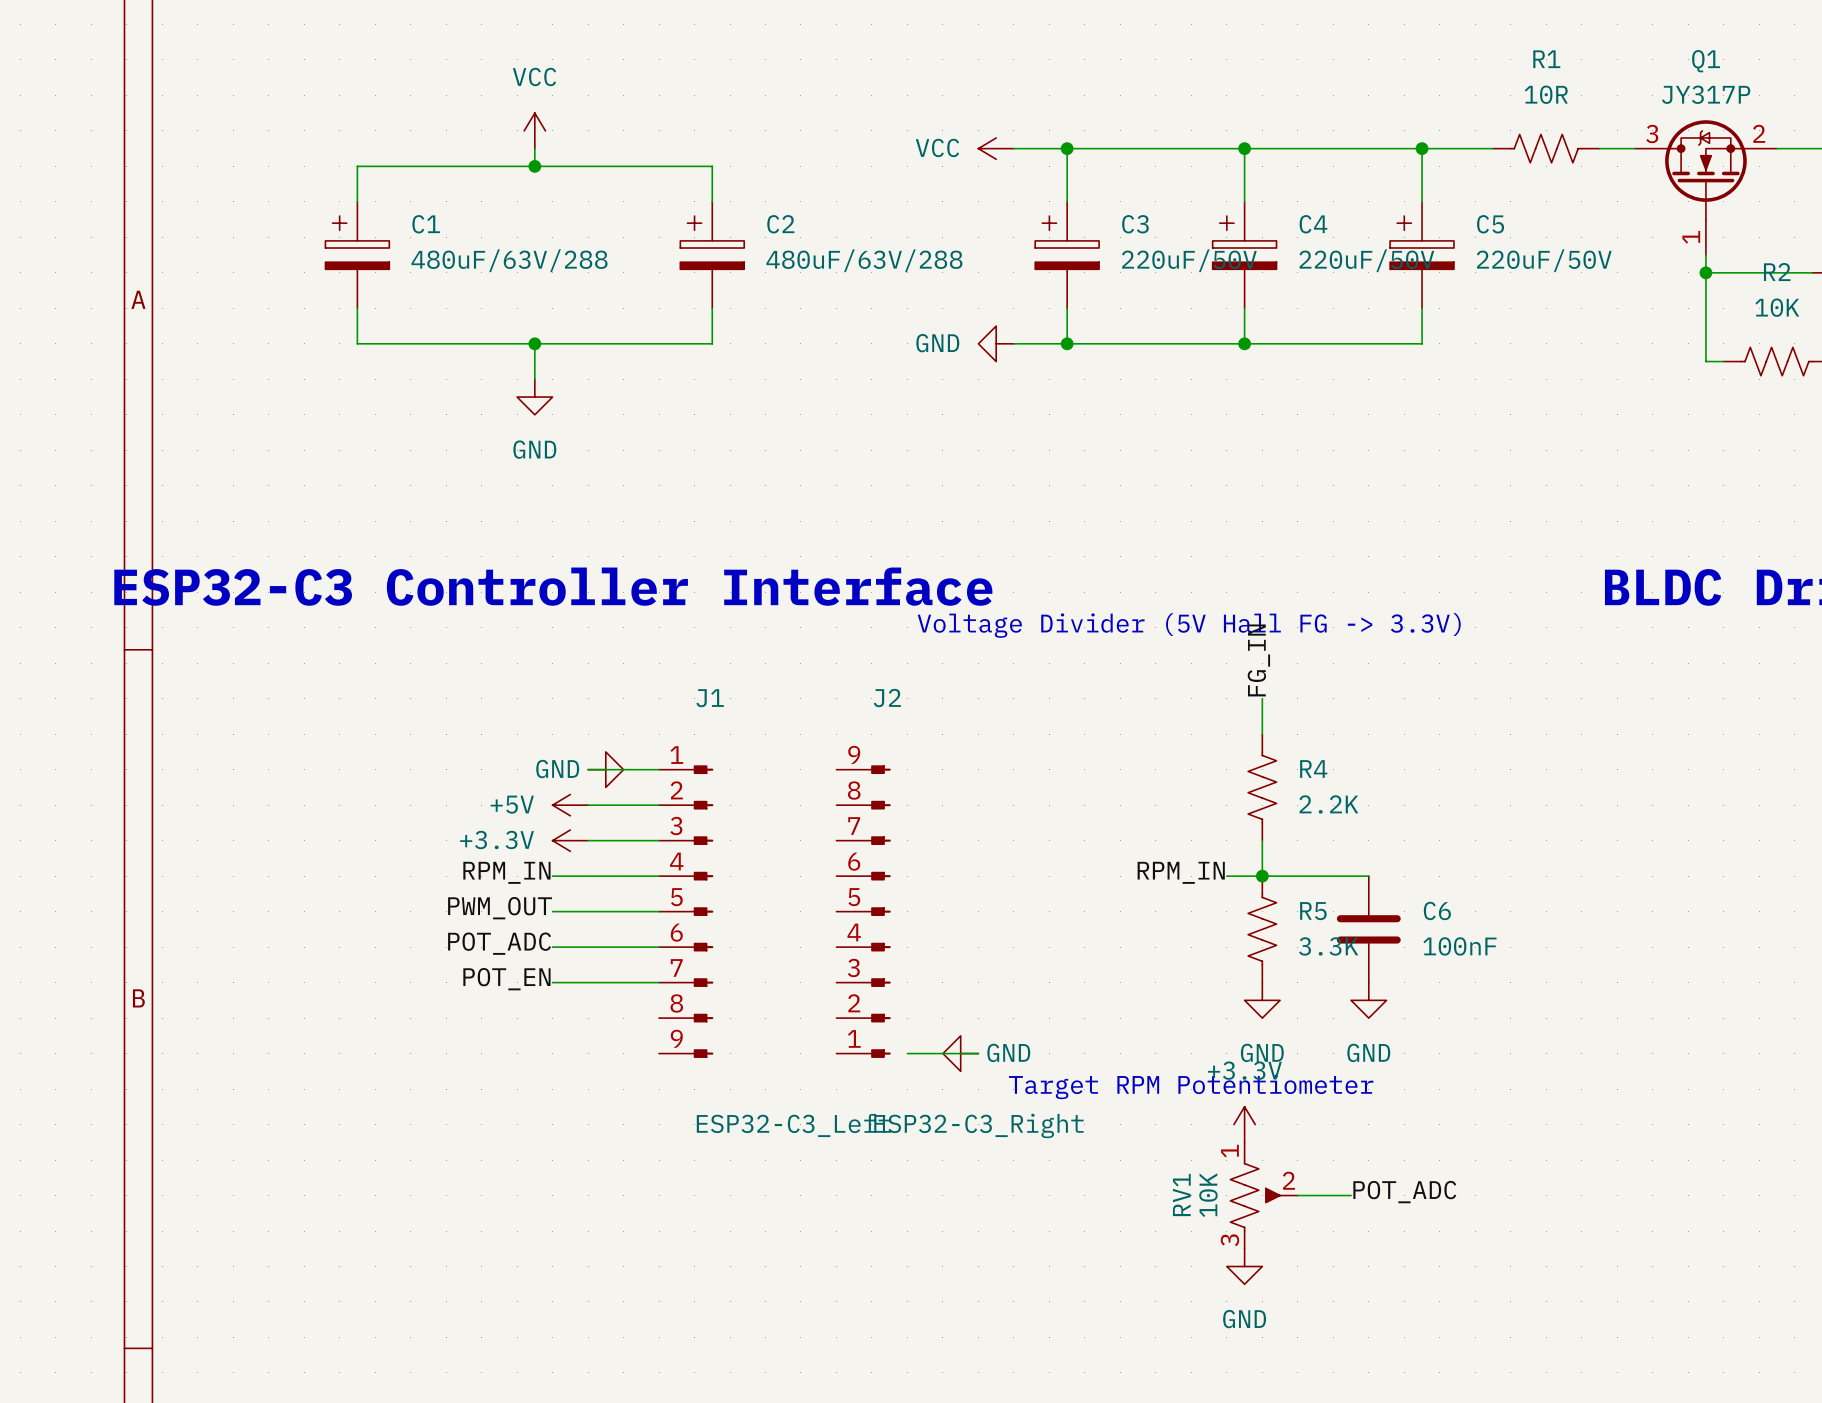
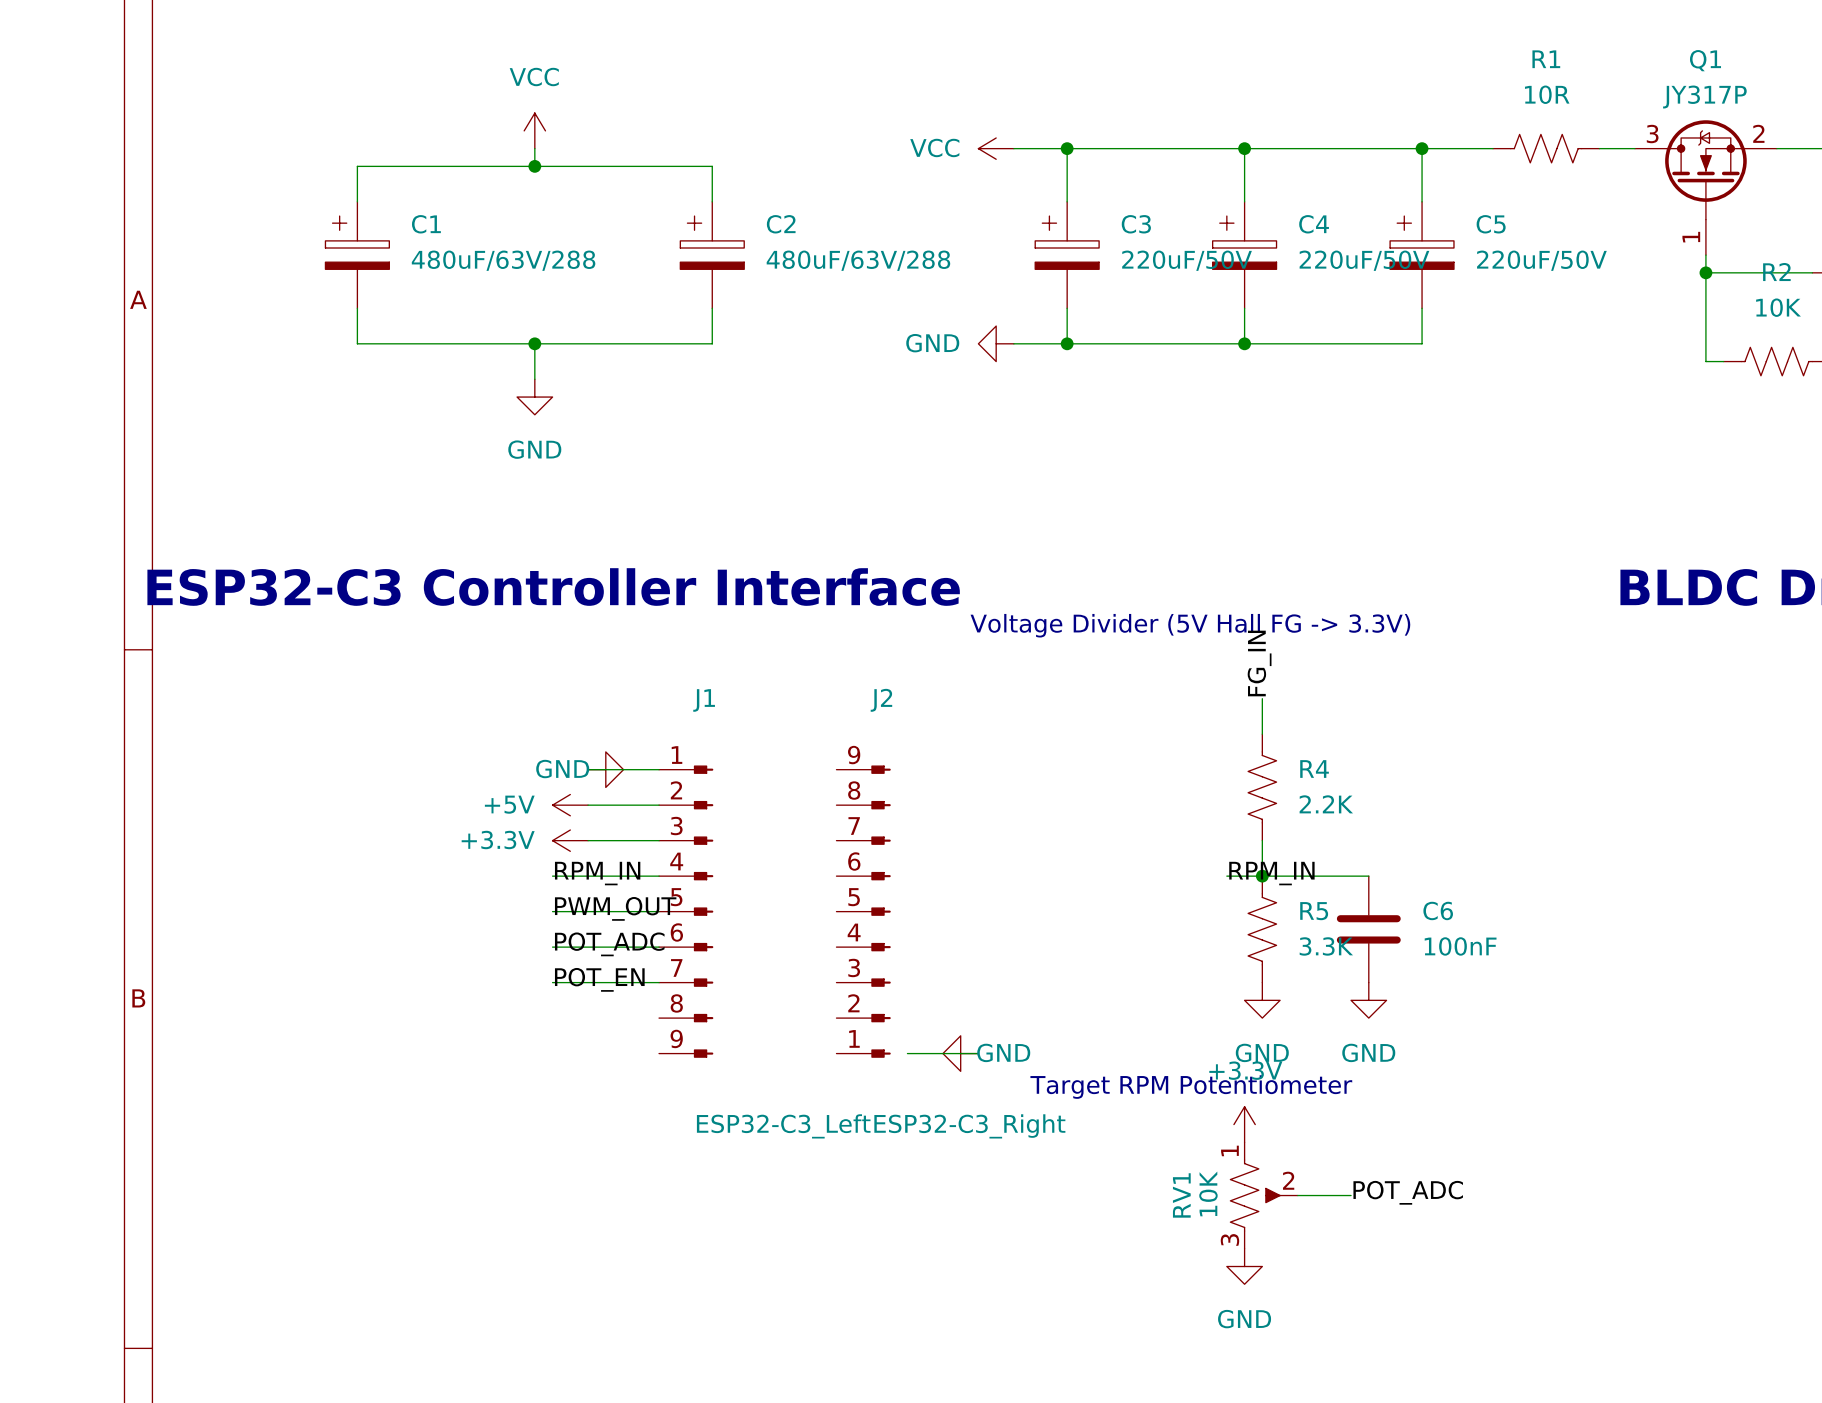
label position: RPM_IN (506, 872) -> RPM_IN (597, 873)
label position: RPM_IN (1181, 872) -> RPM_IN (1271, 873)
label position: PWM_OUT (500, 908) -> PWM_OUT (615, 908)
label position: POT_ADC (499, 943) -> POT_ADC (609, 944)
label position: POT_EN (506, 979) -> POT_EN (599, 979)

